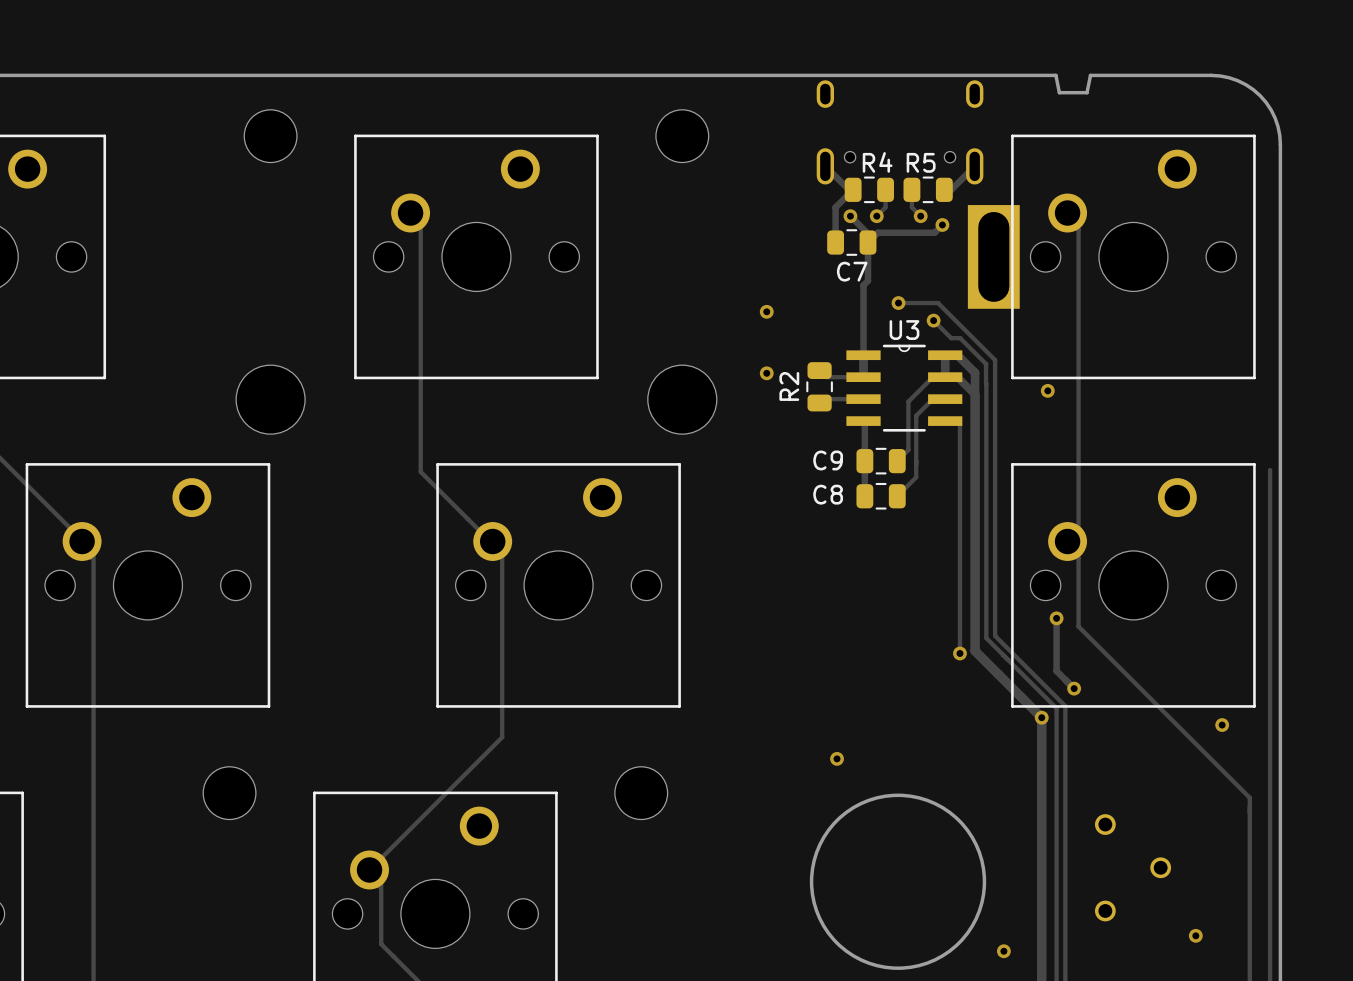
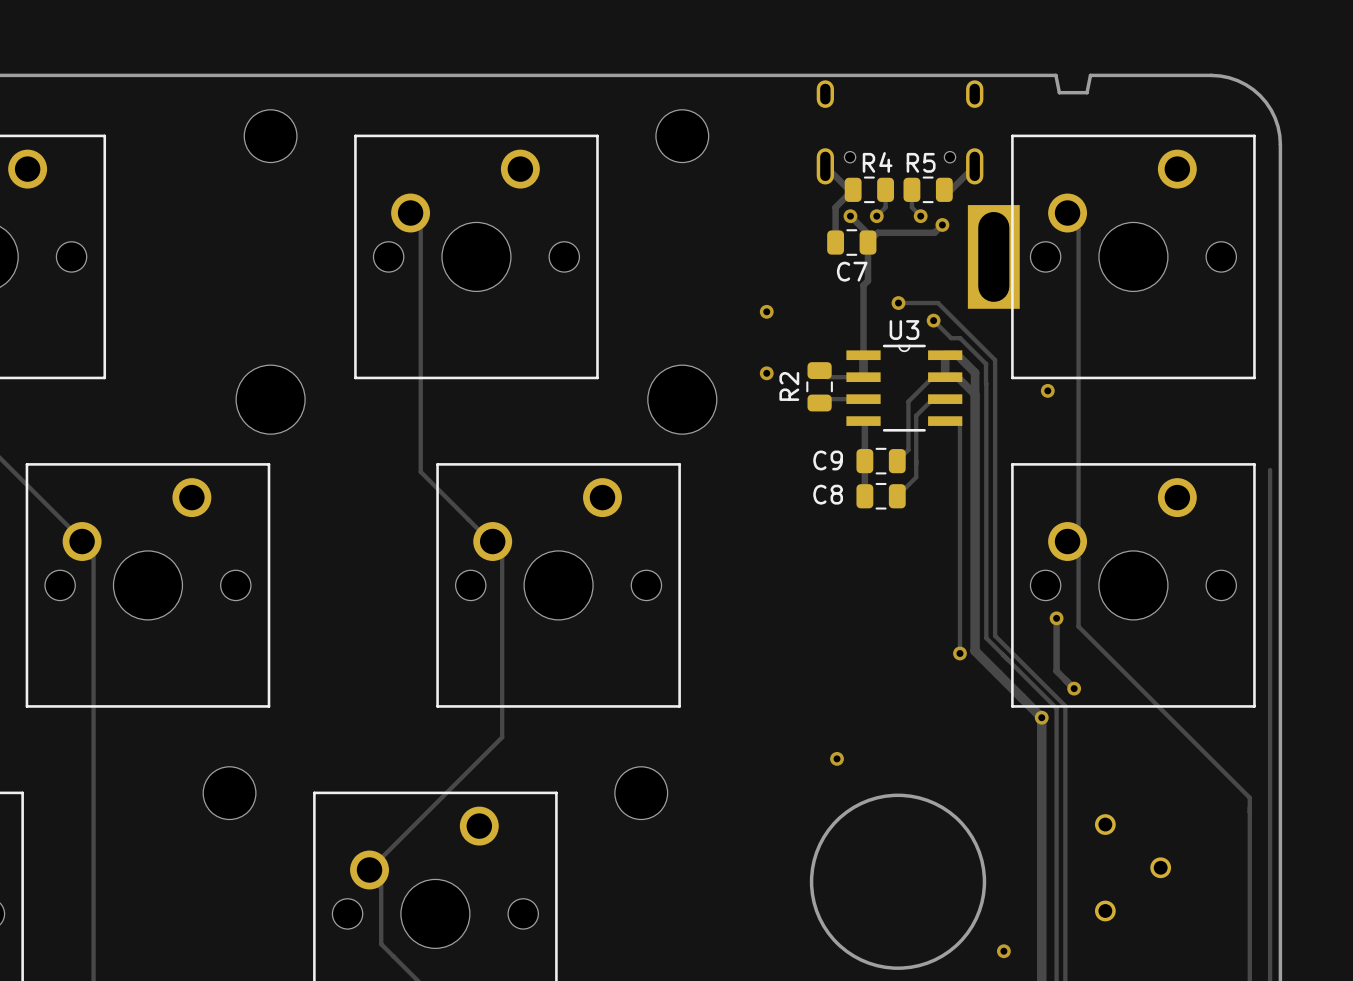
via: (1222, 725) -> none
via: (1195, 935) -> none

